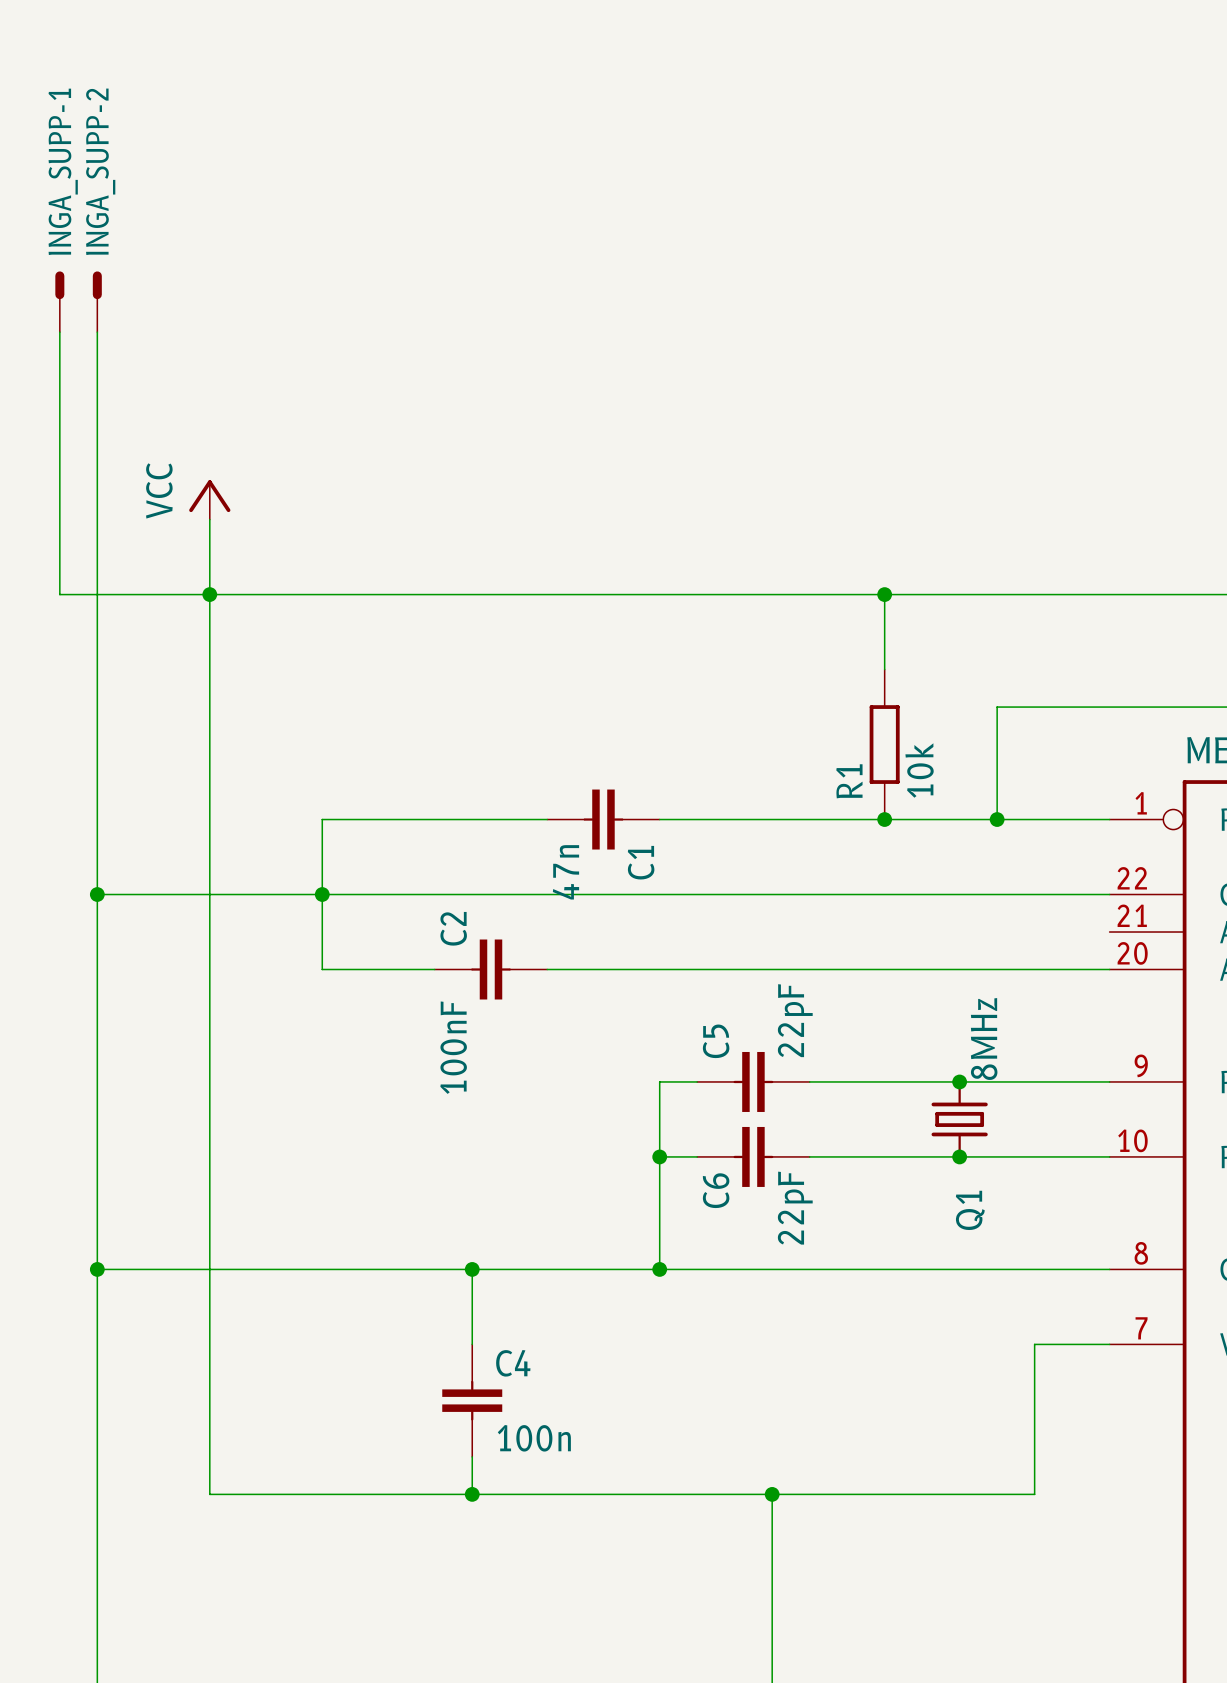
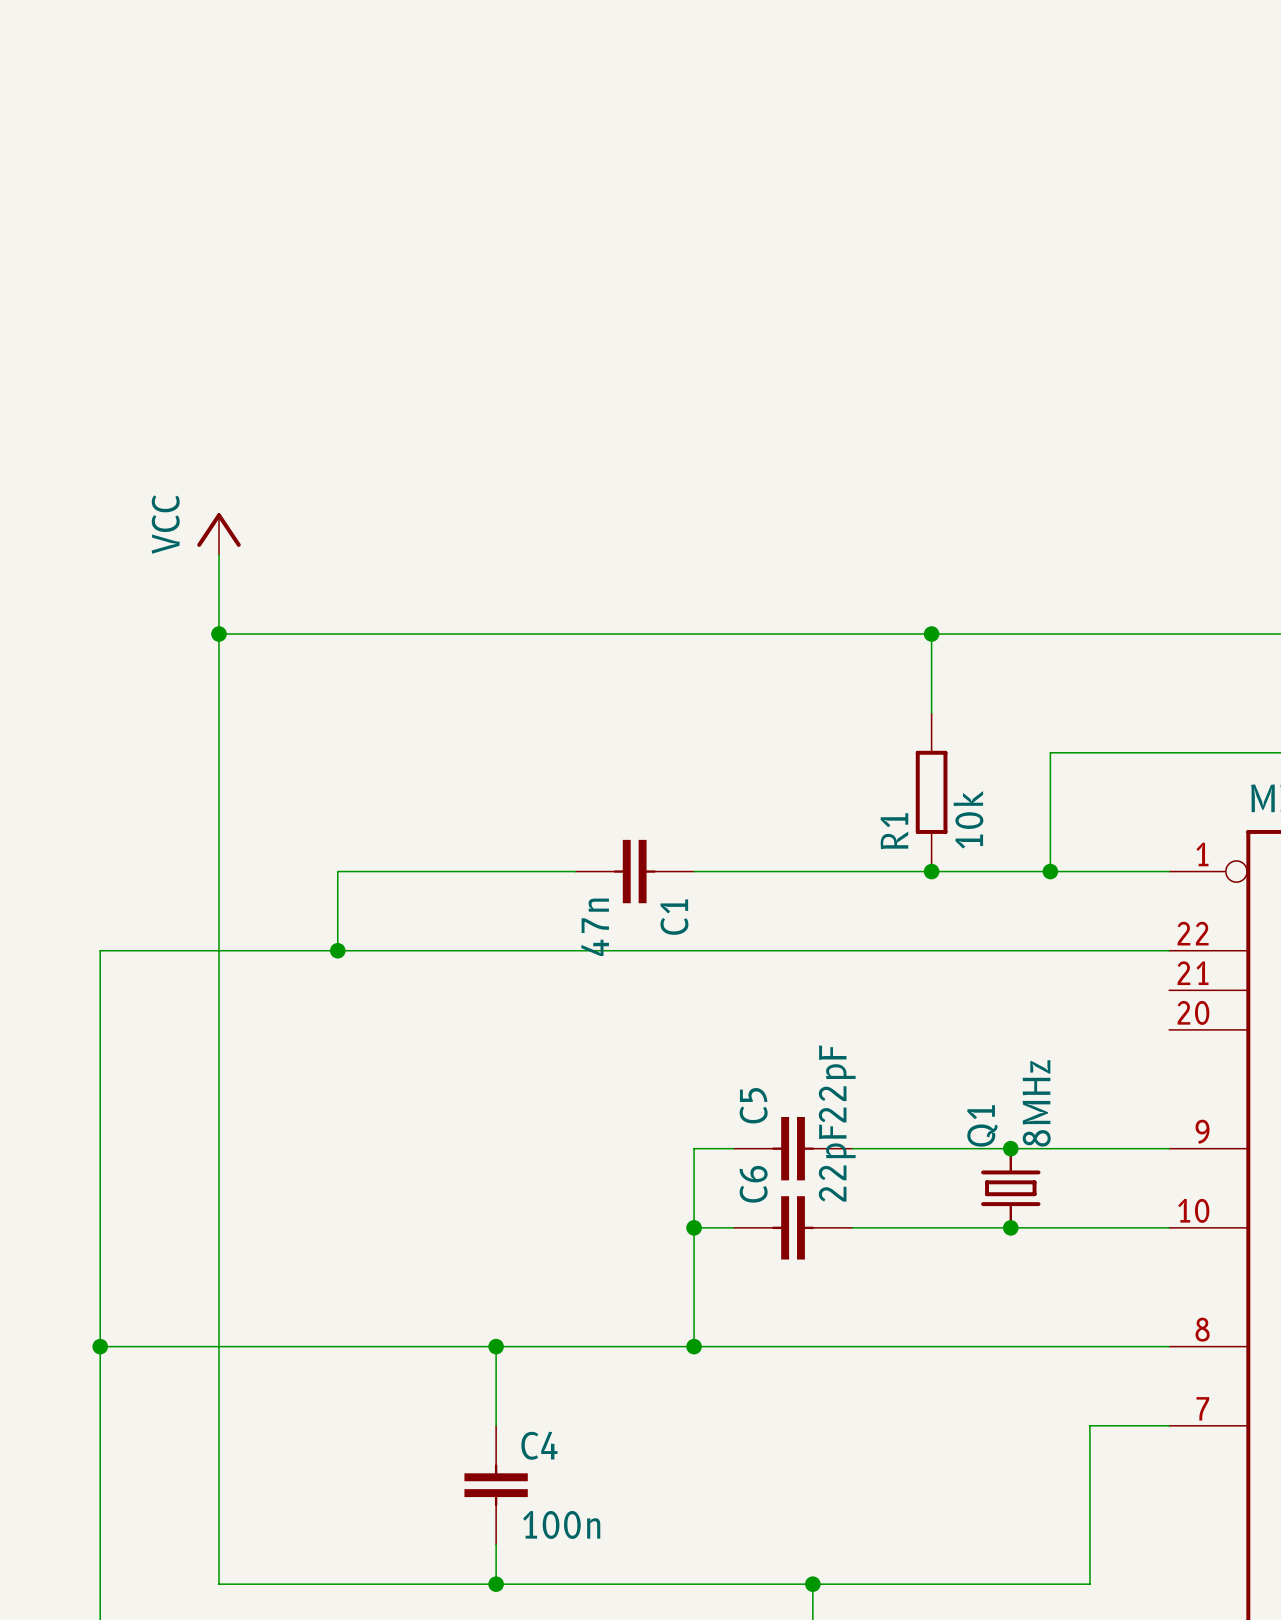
INGA_SUPP-1: (59, 301) -> none
INGA_SUPP-2: (97, 301) -> none
wire: (59, 332) (59, 594) (209, 594) -> none
wire: (97, 332) (97, 894) -> none
junction: (97, 894) -> none
wire: (322, 894) (322, 969) (434, 969) -> none
C2: 100nF (490, 969) -> none
wire: (547, 969) (1109, 969) -> none
C6 name position: C6 (716, 1190) -> C6 (753, 1184)
C6 value position: 22pF (795, 1208) -> 22pF (837, 1163)
Q1 name position: Q1 (970, 1210) -> Q1 (982, 1125)

